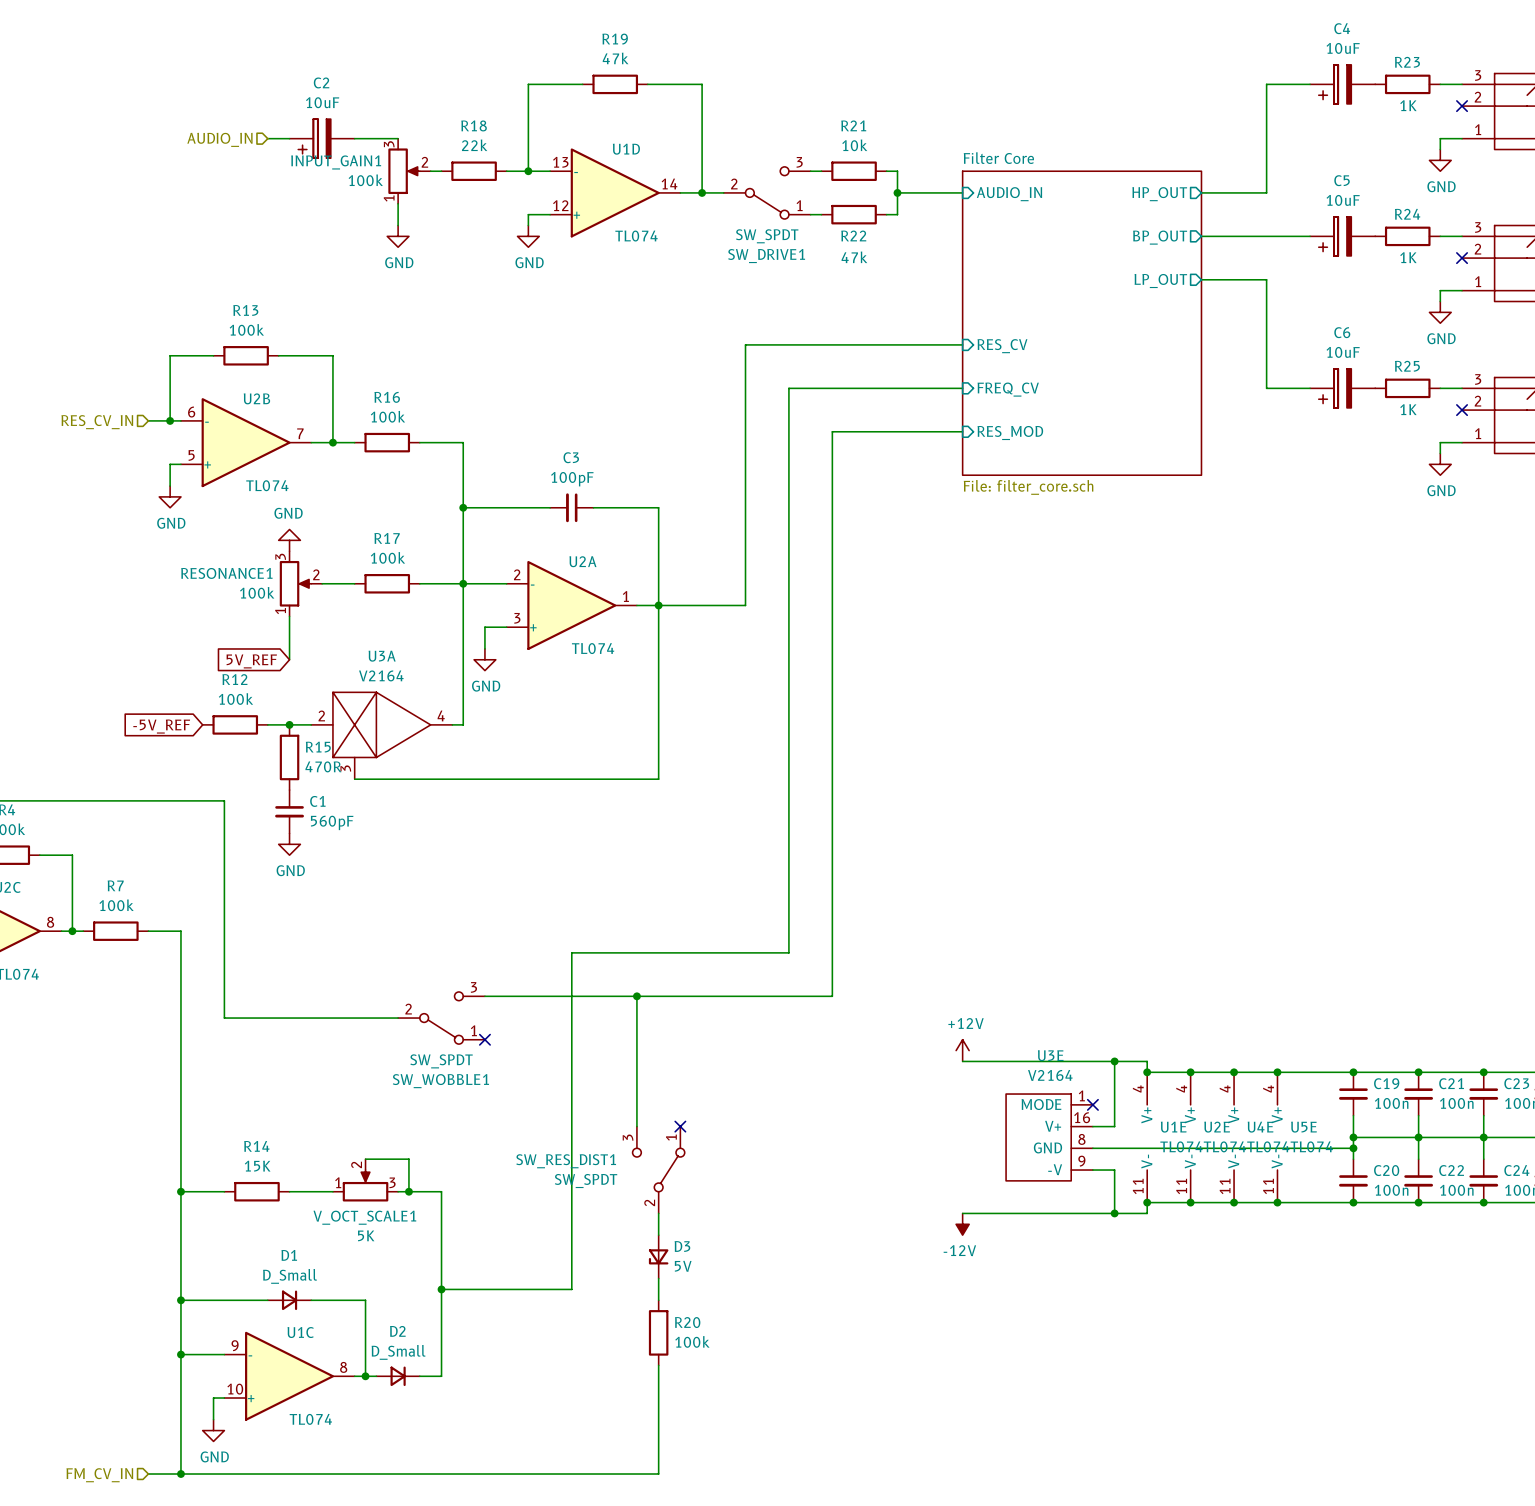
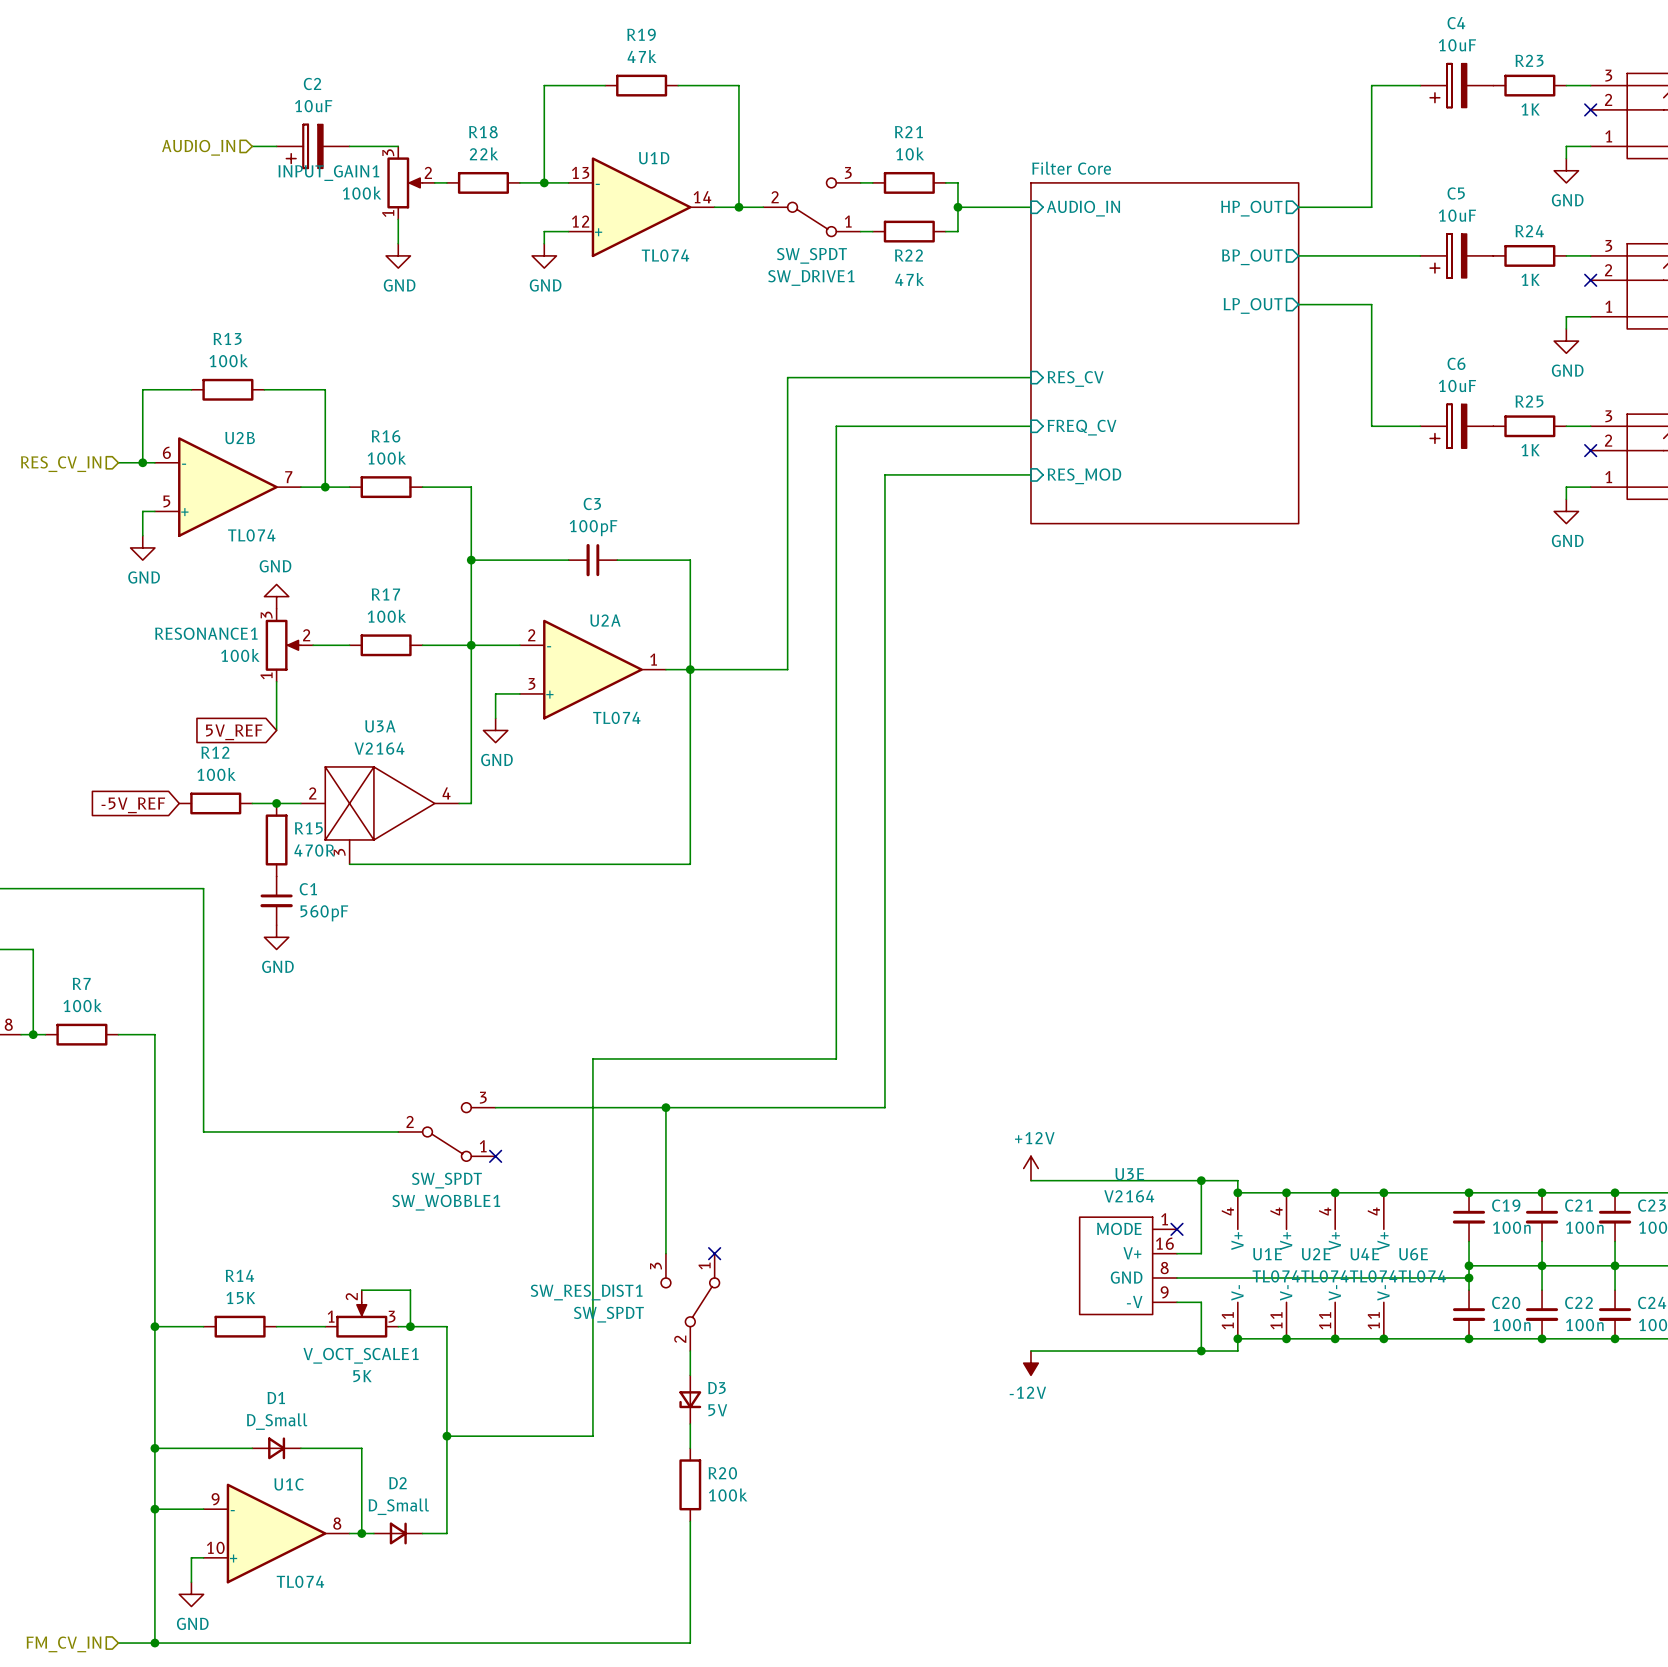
sheet Filter Core value: File: filter_core.sch (1028, 487) -> none
U5E name: U5E (1303, 1127) -> U6E (1413, 1254)

